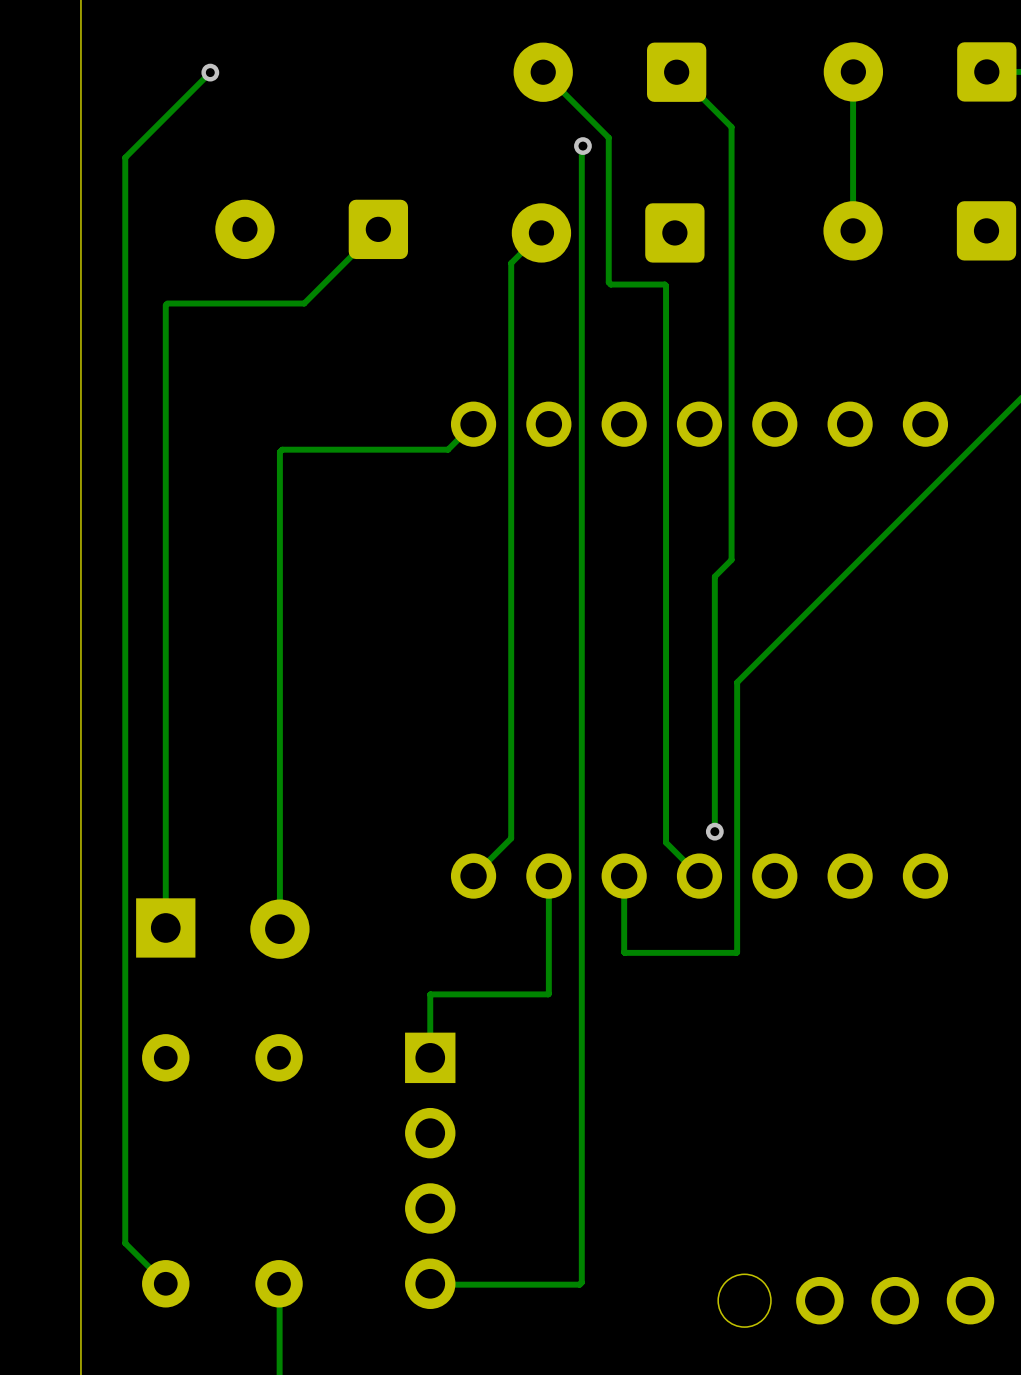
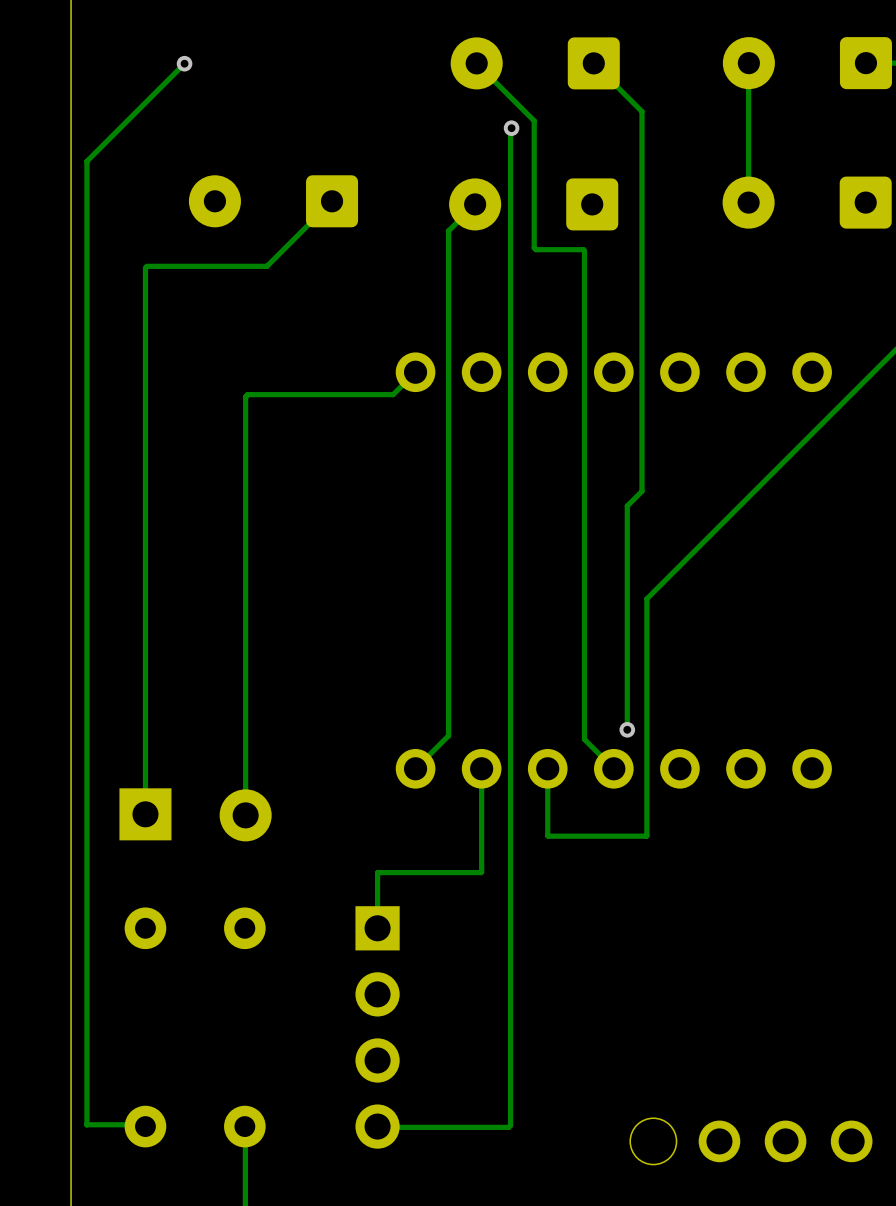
track: (125, 157) (125, 1243) (163, 1281) -> (109, 138) (86, 161) (86, 1124)
track: none -> (143, 1124) (86, 1124)

